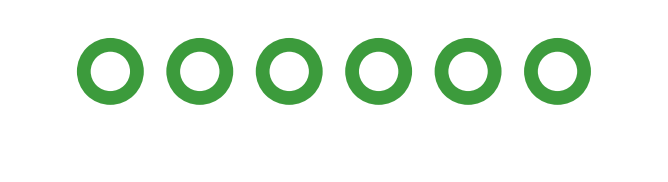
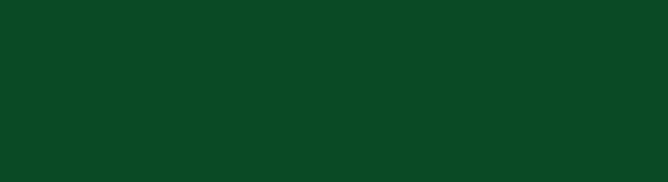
part: (155, 71) -> none
part: (333, 71) -> none
part: (512, 71) -> none

